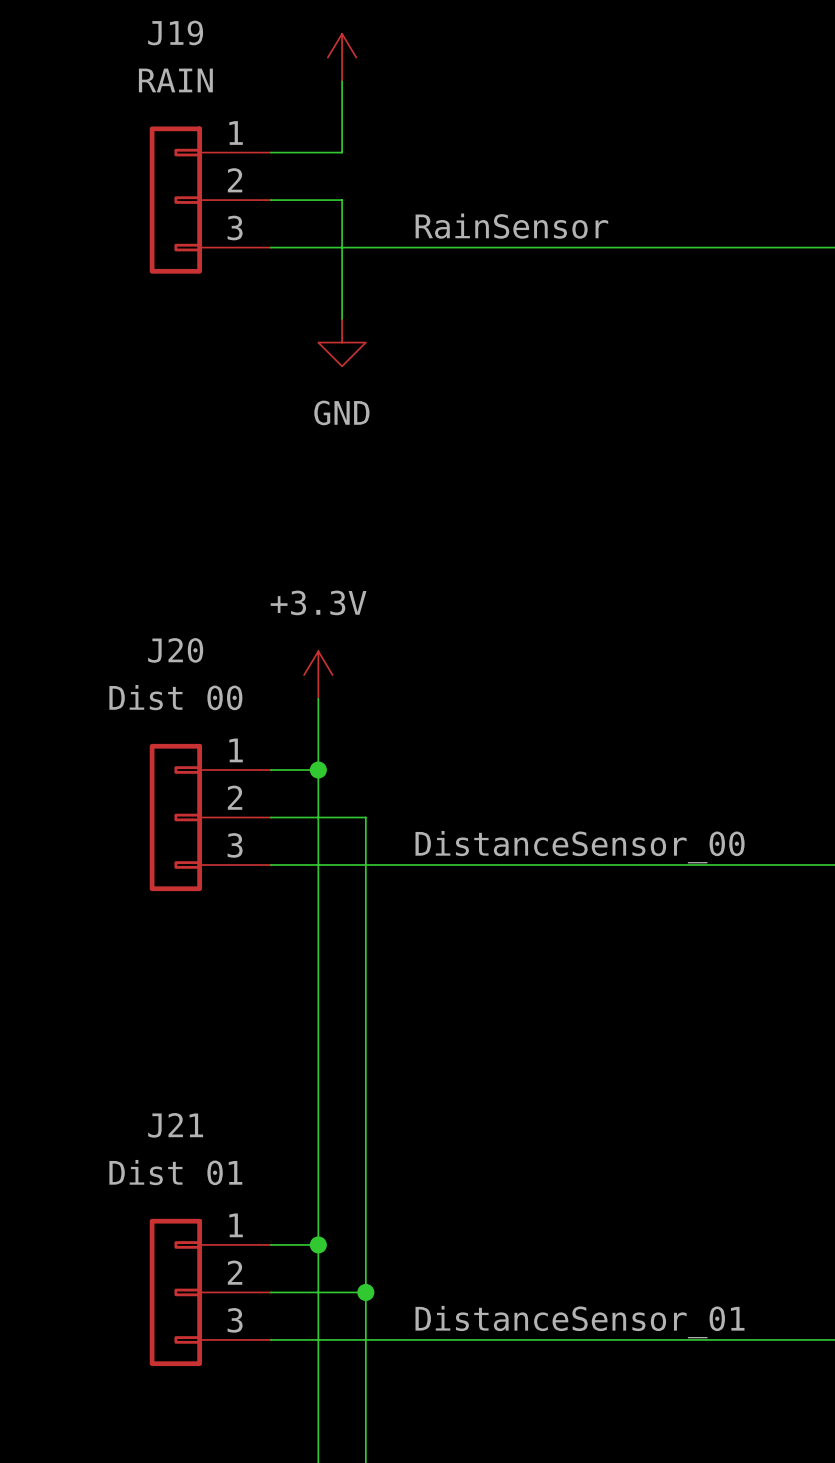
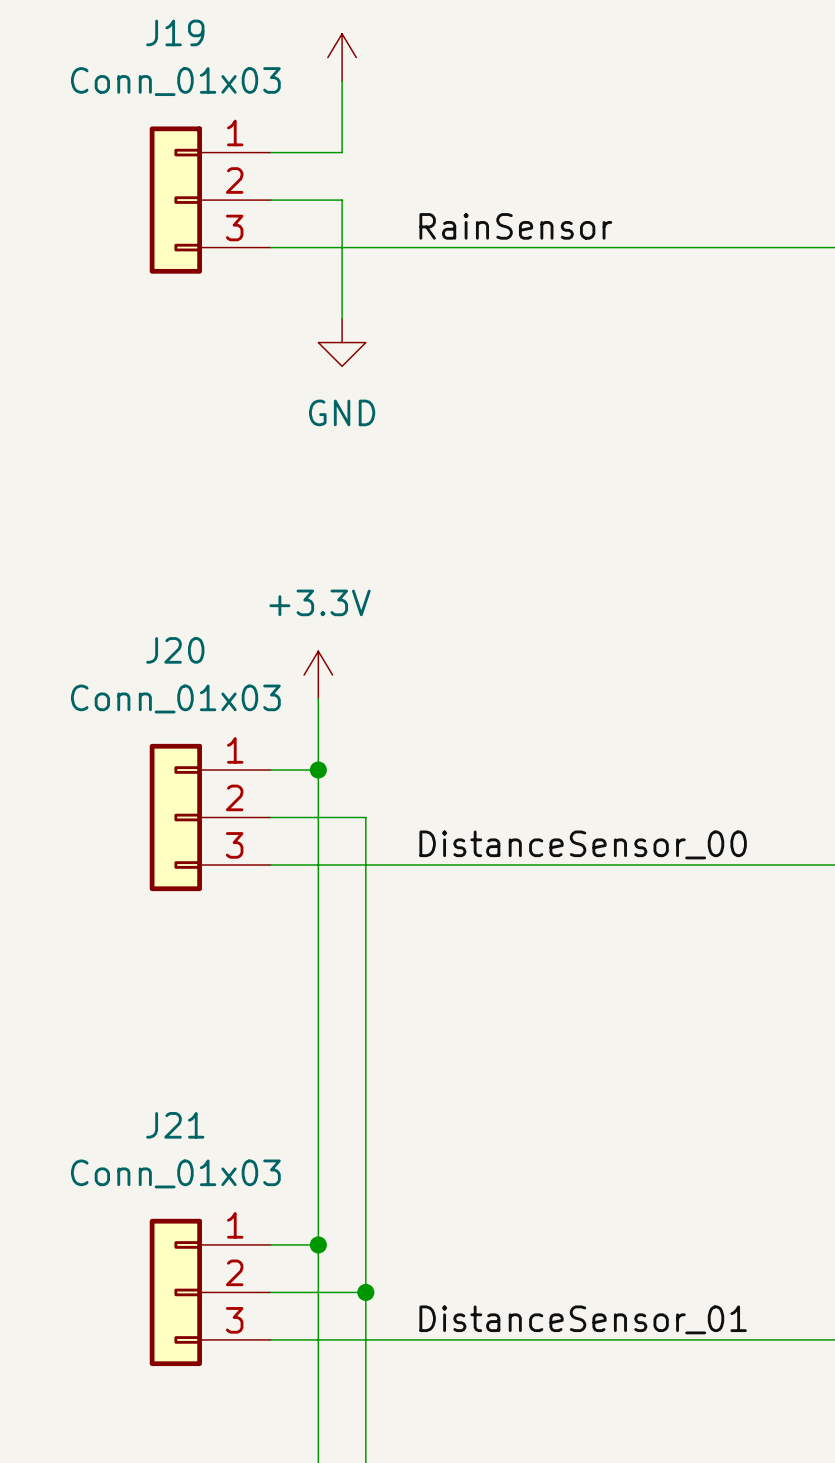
J19 value: RAIN (175, 80) -> Conn_01x03 (175, 81)
J20 value: Dist 00 (175, 697) -> Conn_01x03 (175, 699)
J21 value: Dist 01 (175, 1172) -> Conn_01x03 (175, 1173)

